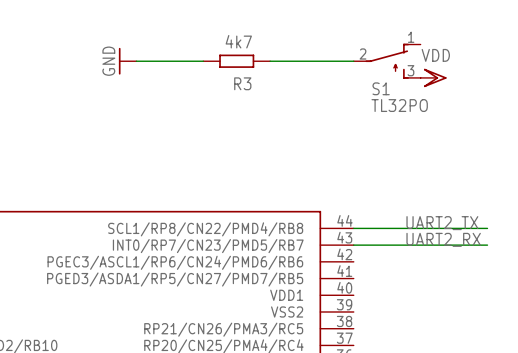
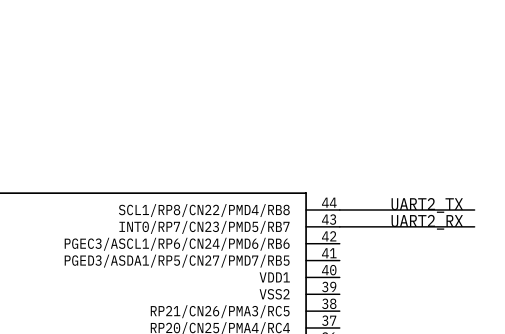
power symbol: GND (127, 61) -> none
wire: (136, 61) (203, 61) -> none
R3: 4k7 (236, 61) -> none
wire: (270, 61) (353, 61) -> none
S1: TL32PO (387, 61) -> none
power symbol: VDD (433, 77) -> none

